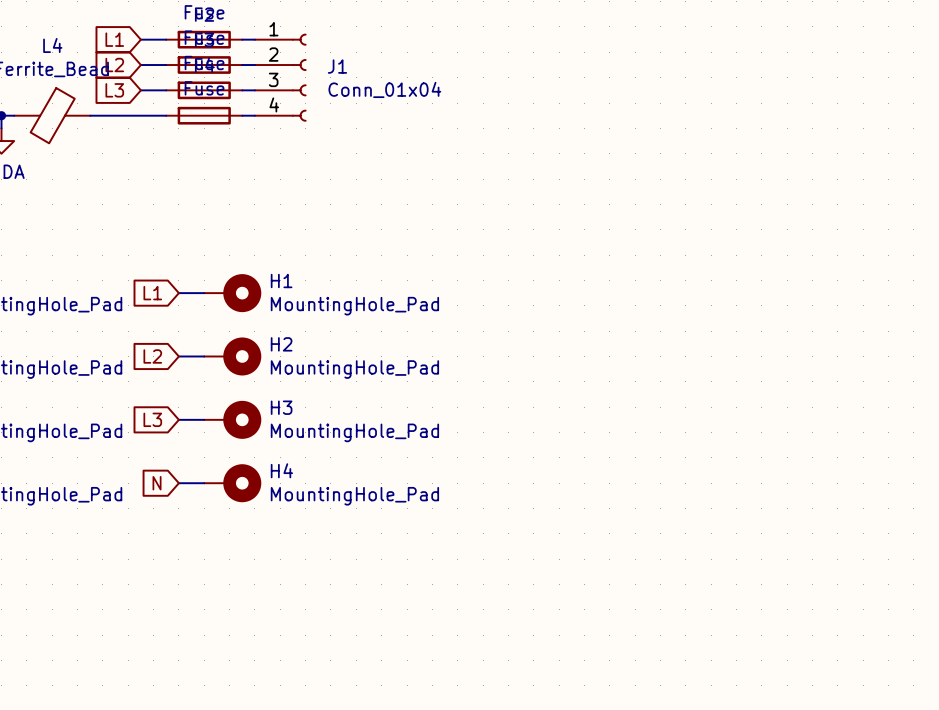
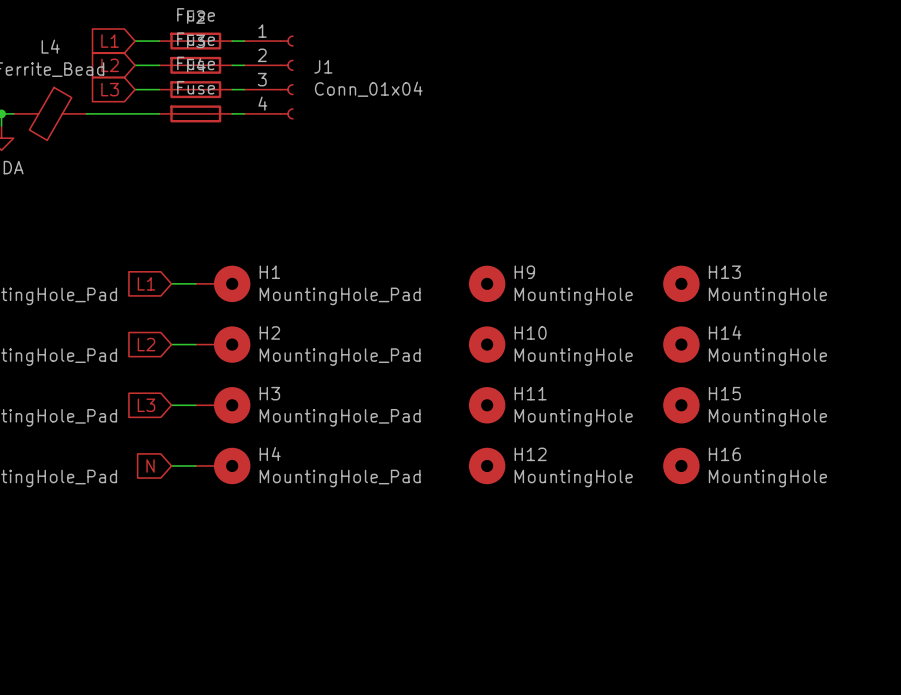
H9: none -> MountingHole (487, 283)
H13: none -> MountingHole (681, 283)
H10: none -> MountingHole (487, 344)
H14: none -> MountingHole (681, 344)
H11: none -> MountingHole (487, 405)
H15: none -> MountingHole (681, 405)
H12: none -> MountingHole (487, 465)
H16: none -> MountingHole (681, 465)

